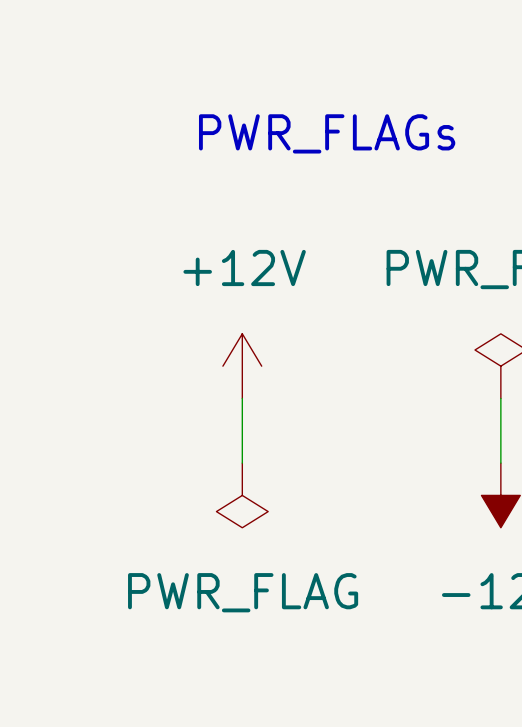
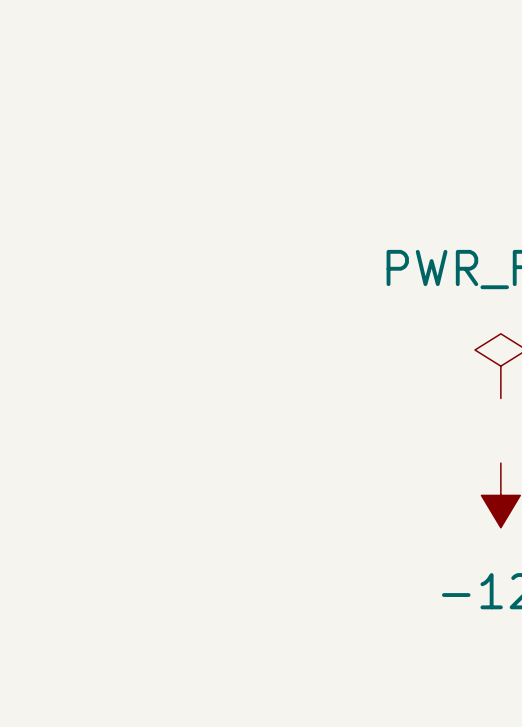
text: PWR_FLAGs (327, 133) -> none
power symbol: +12V (242, 366) -> none
wire: (242, 398) (242, 463) -> none
wire: (500, 398) (500, 463) -> none
power symbol: PWR_FLAG (242, 495) -> none

